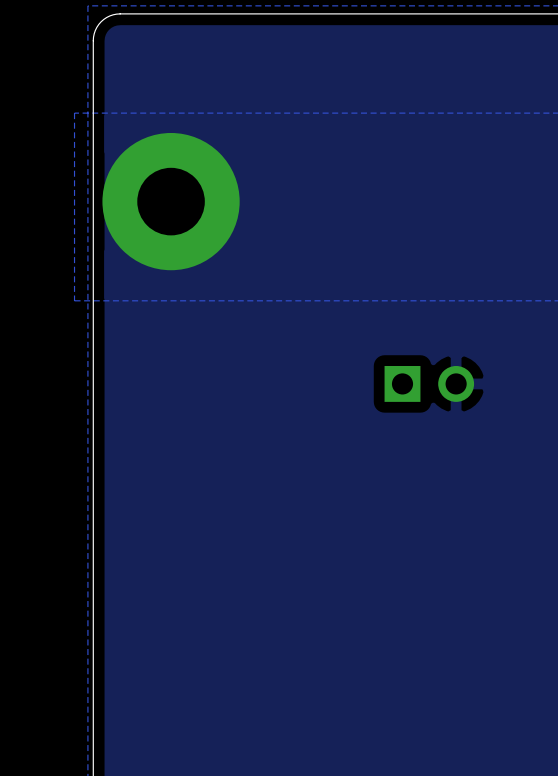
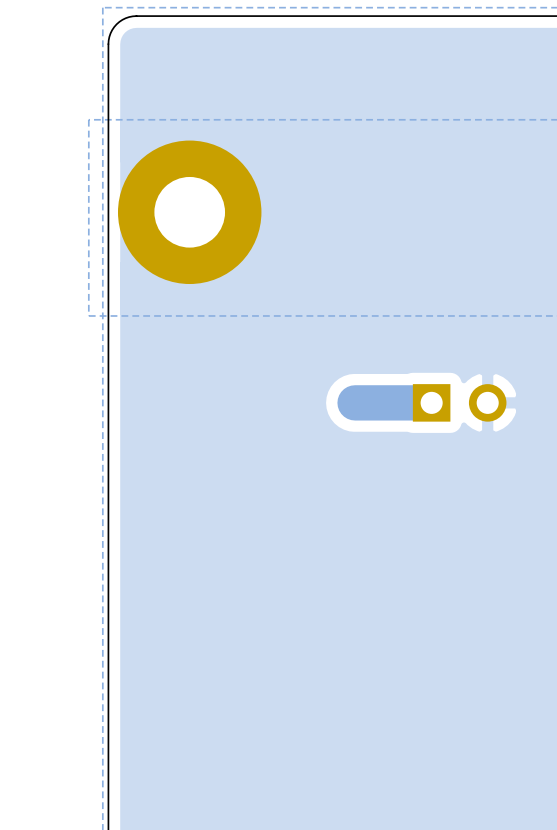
track: none -> (431, 402) (355, 402)

